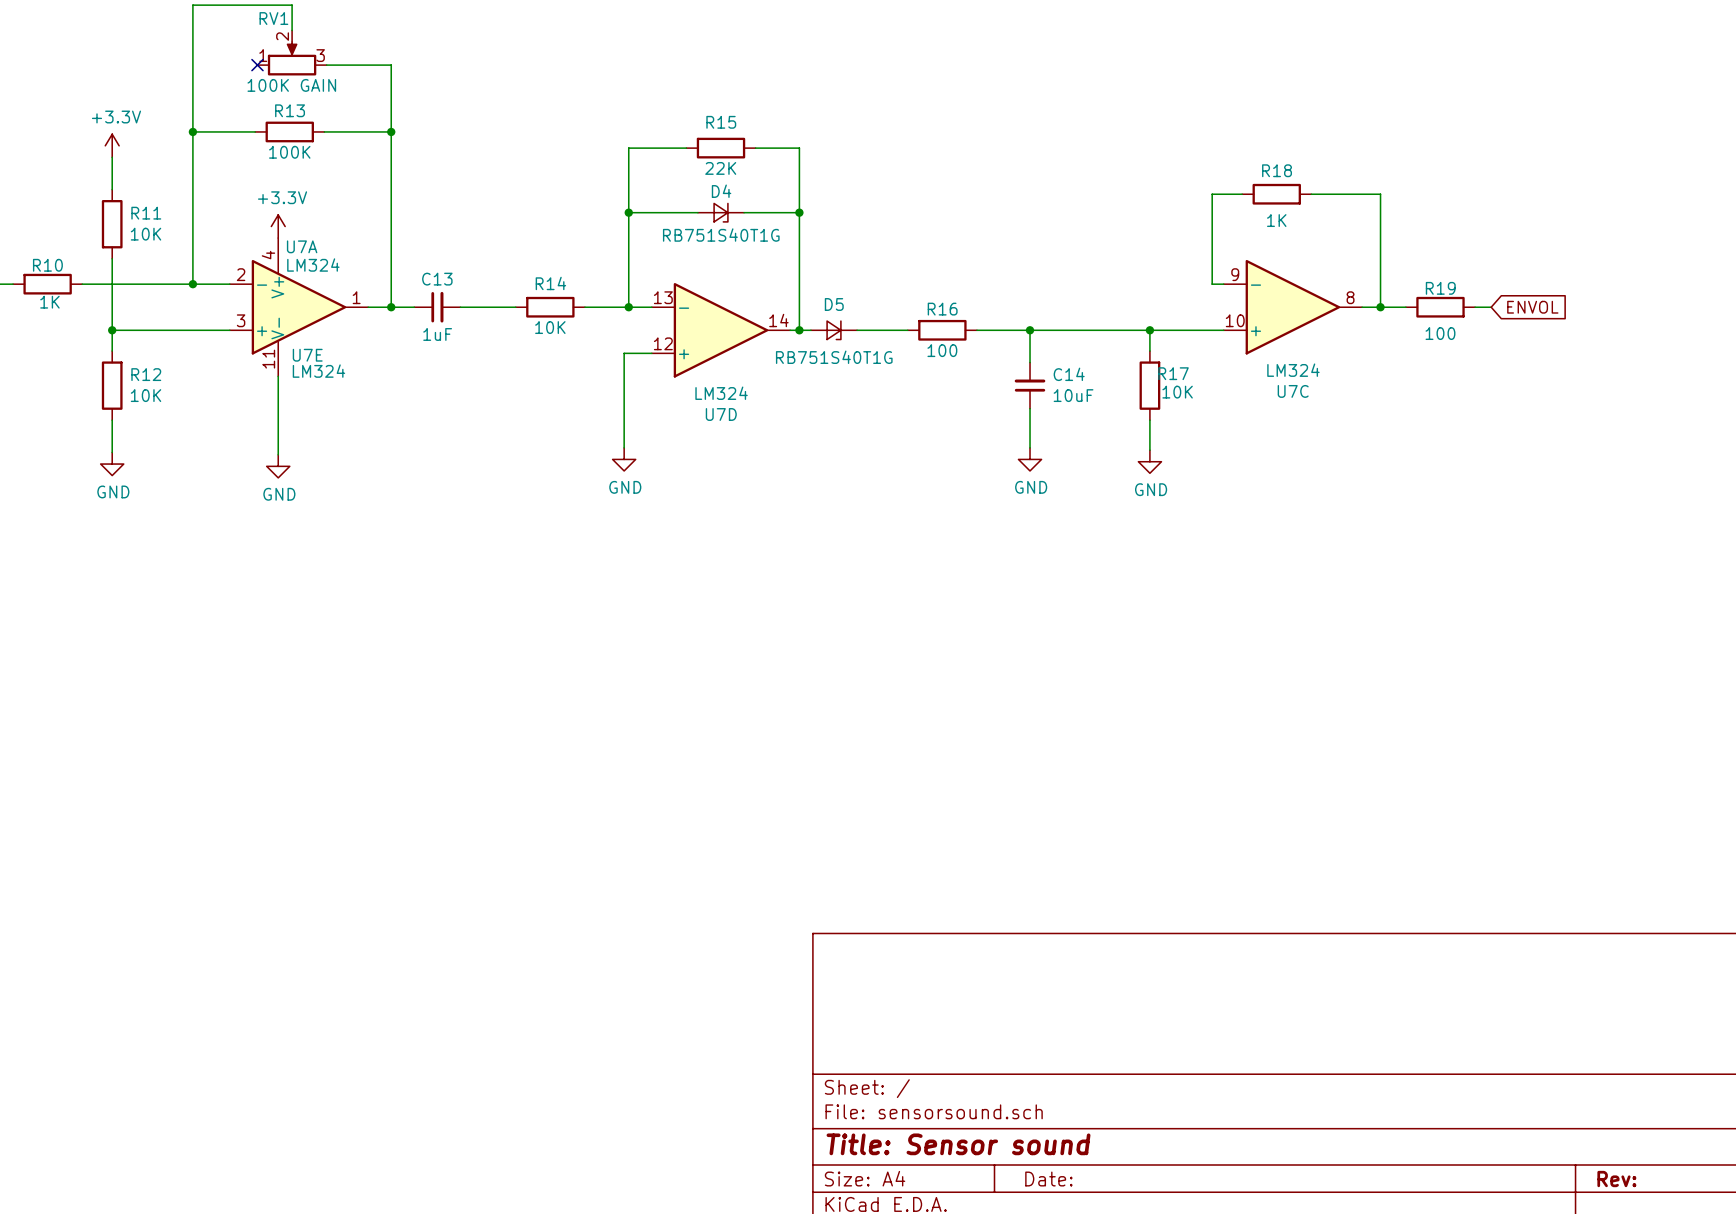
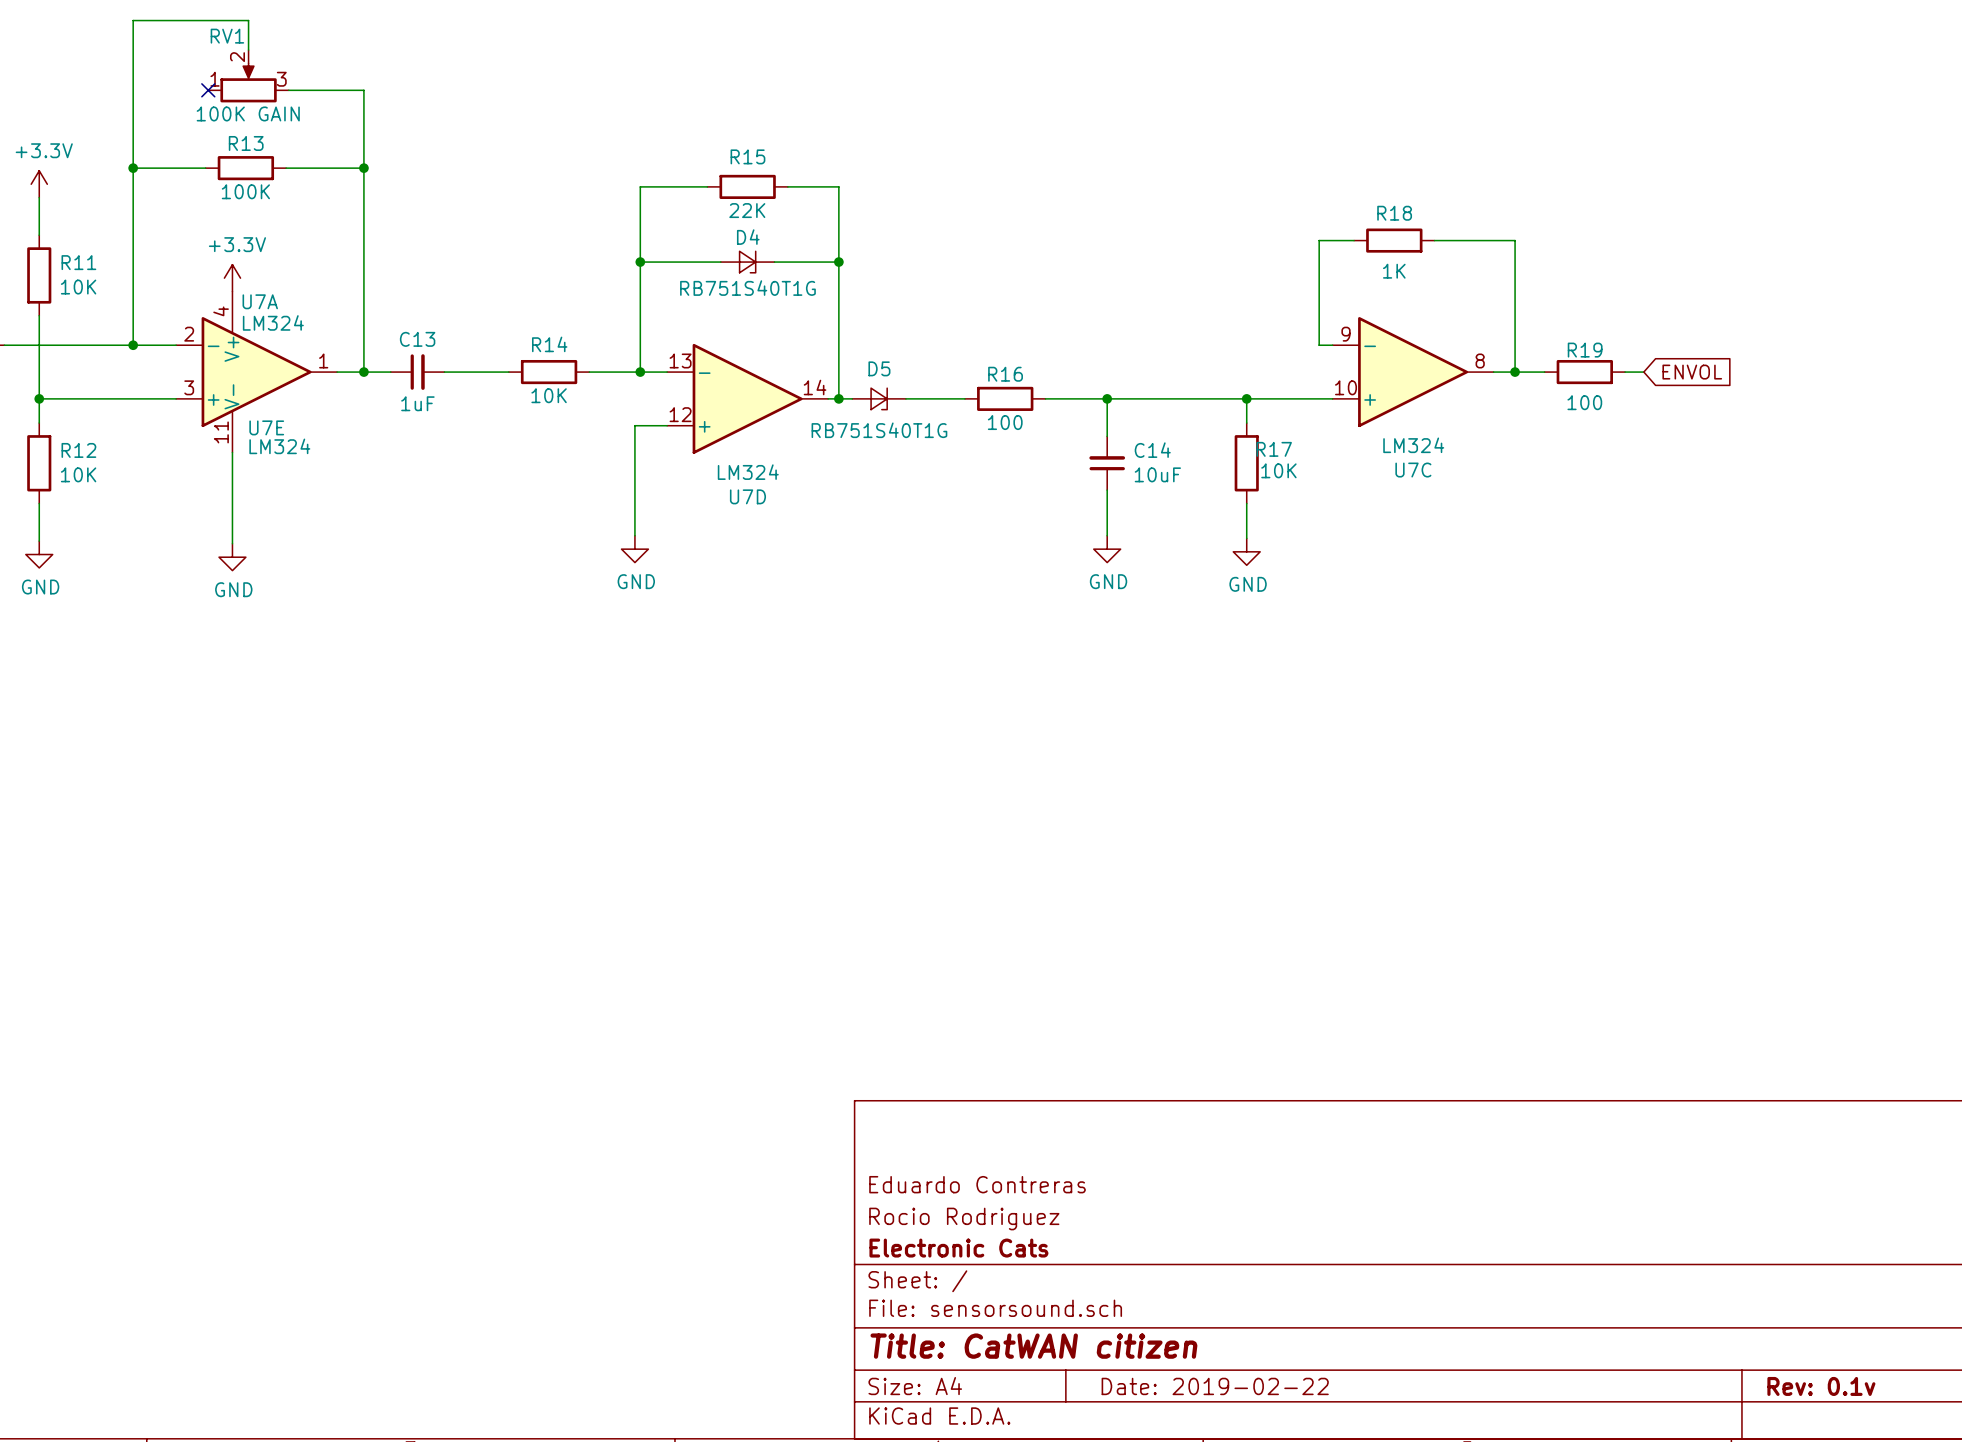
title block: none -> Eduardo Contreras (977, 1184)
title block: none -> Rocio Rodriguez (964, 1219)
title block: none -> Electronic Cats (958, 1248)
title block: Title: Sensor sound (958, 1144) -> Title: CatWAN citizen (1033, 1346)
title block: Date: (1048, 1179) -> Date: 2019-02-22 (1215, 1386)
title block: Rev: (1616, 1179) -> Rev: 0.1v (1821, 1386)

